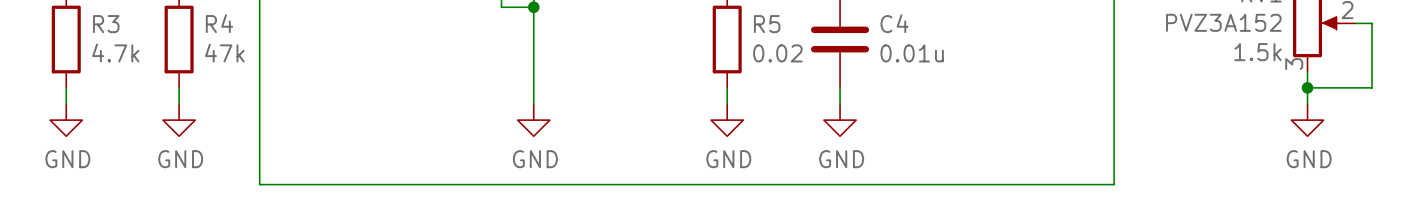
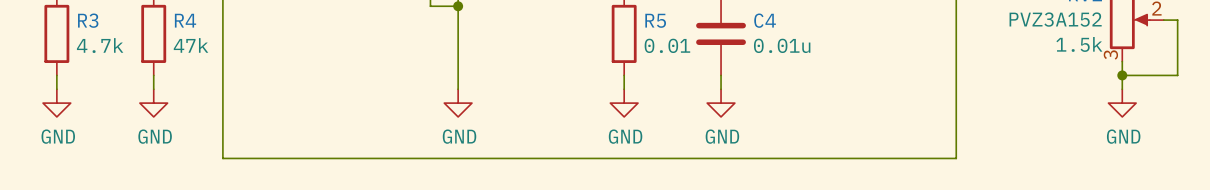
R5 value: 0.02 (777, 53) -> 0.01 (667, 45)

